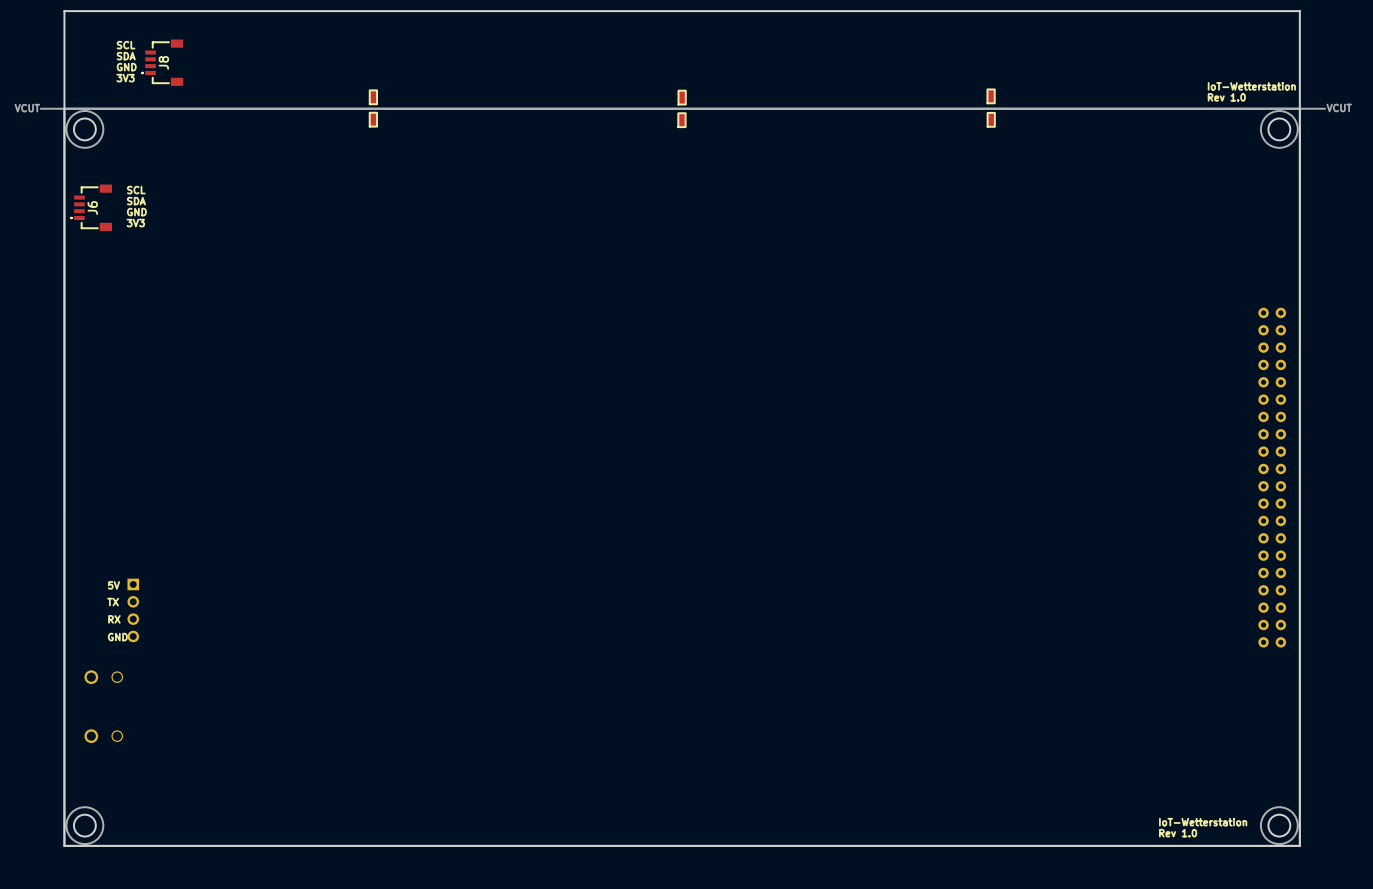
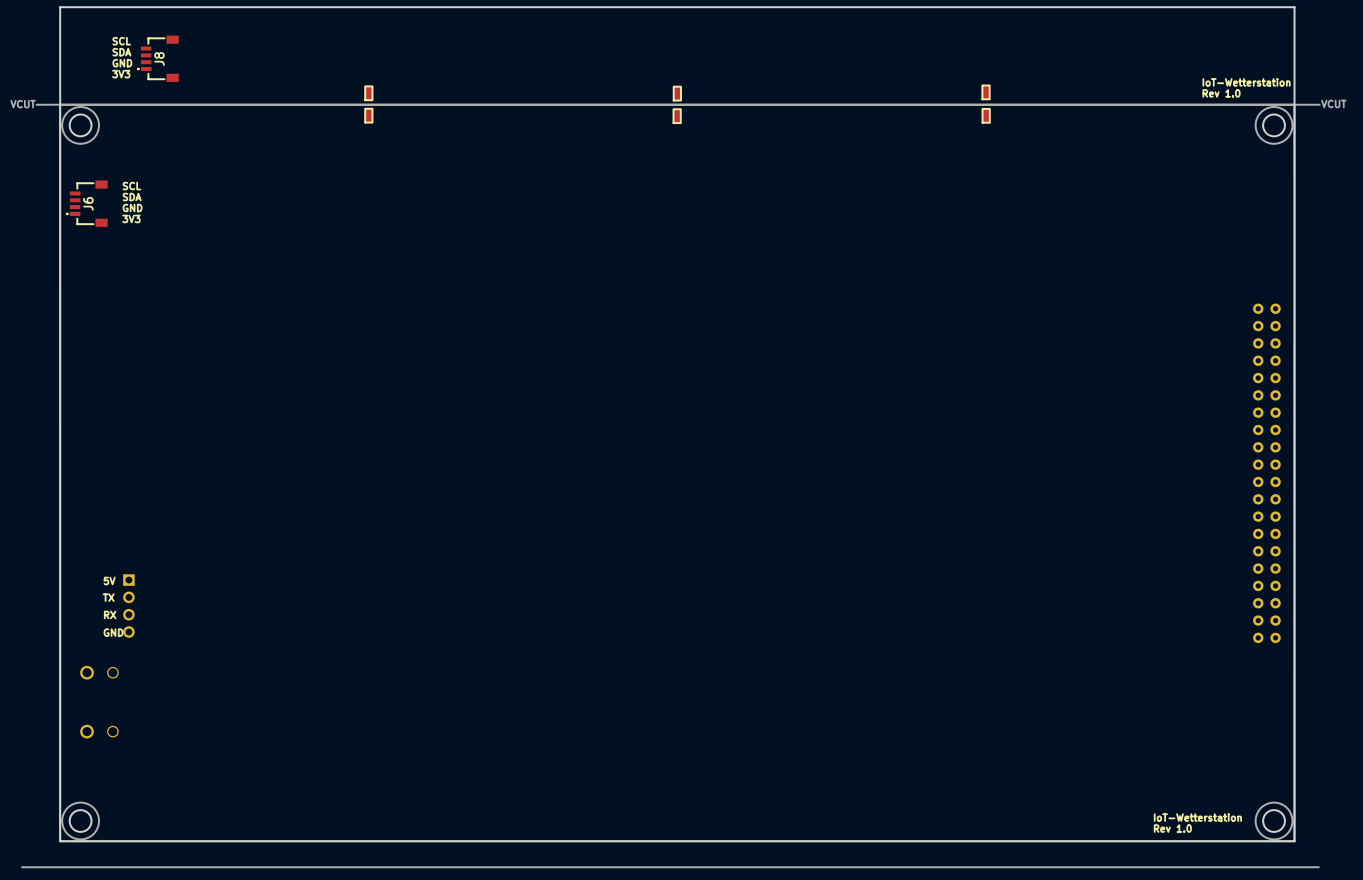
line: none -> (22, 867) (1318, 867)

